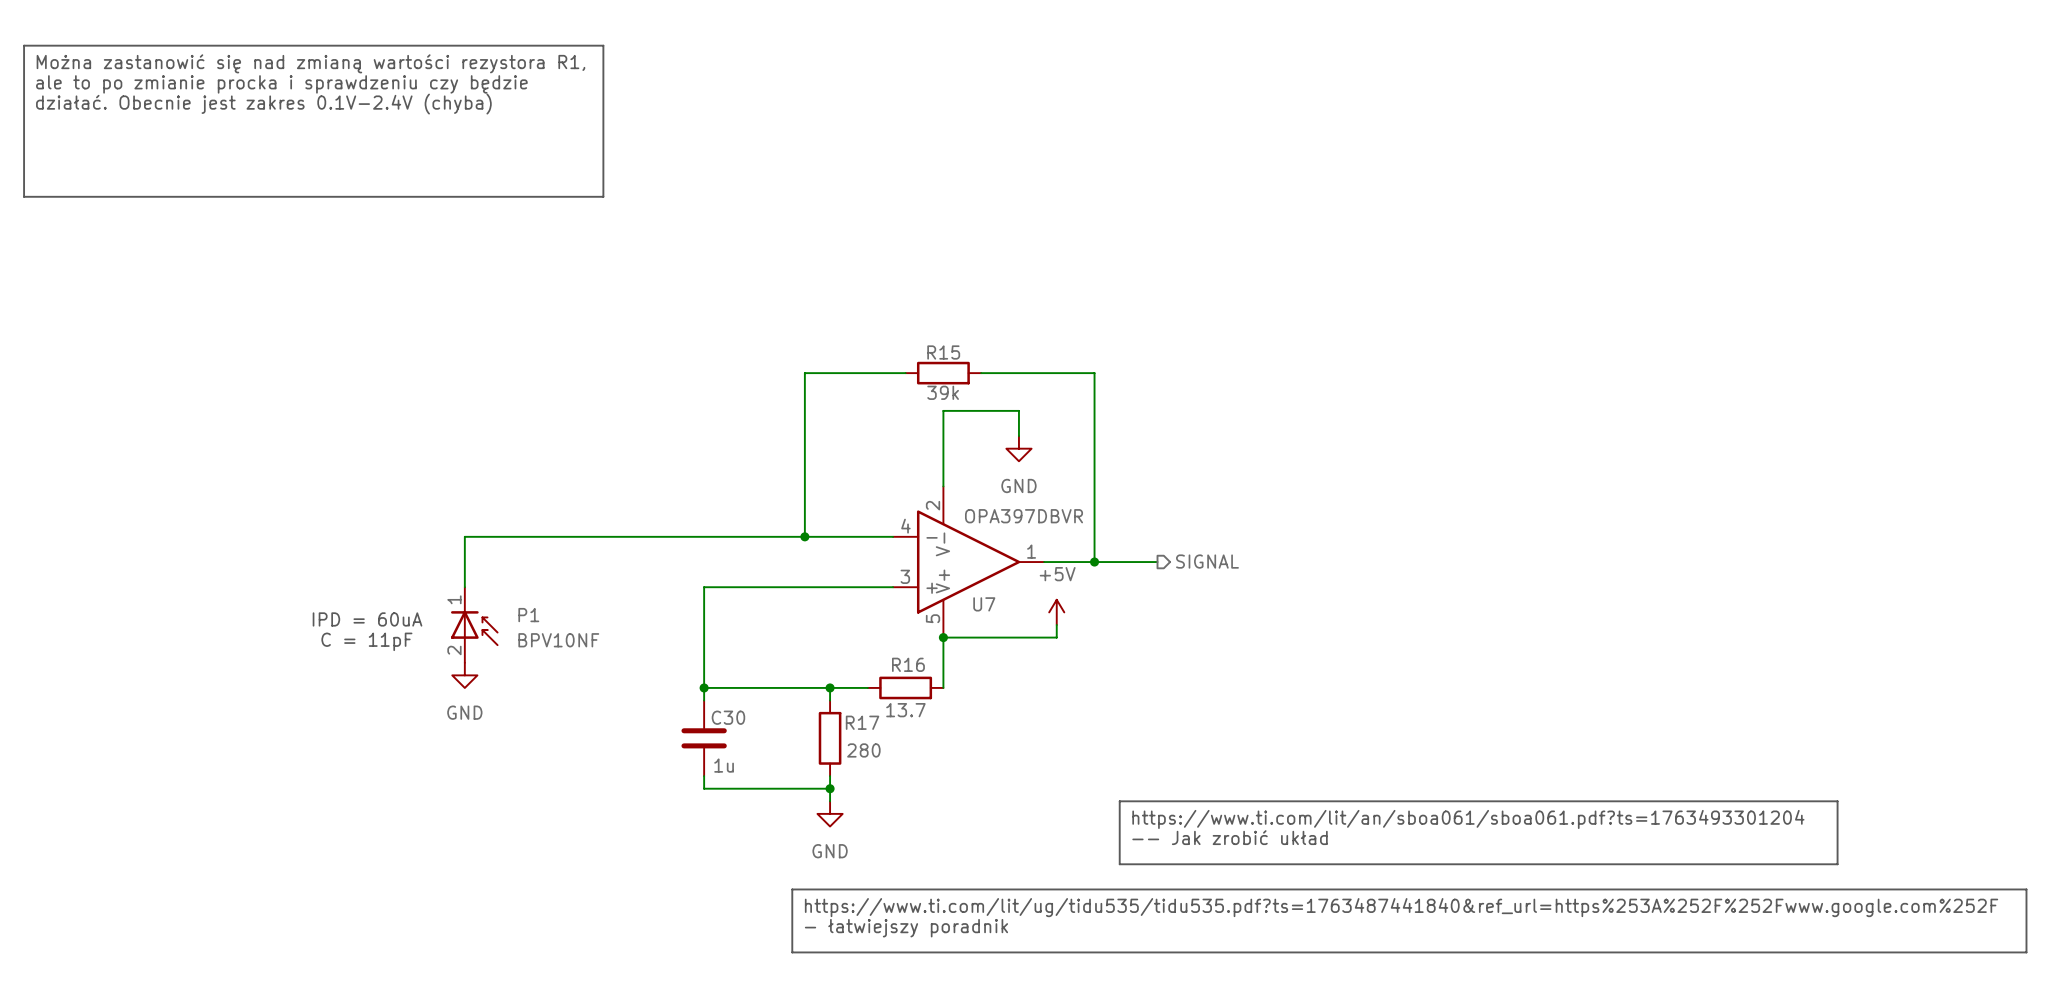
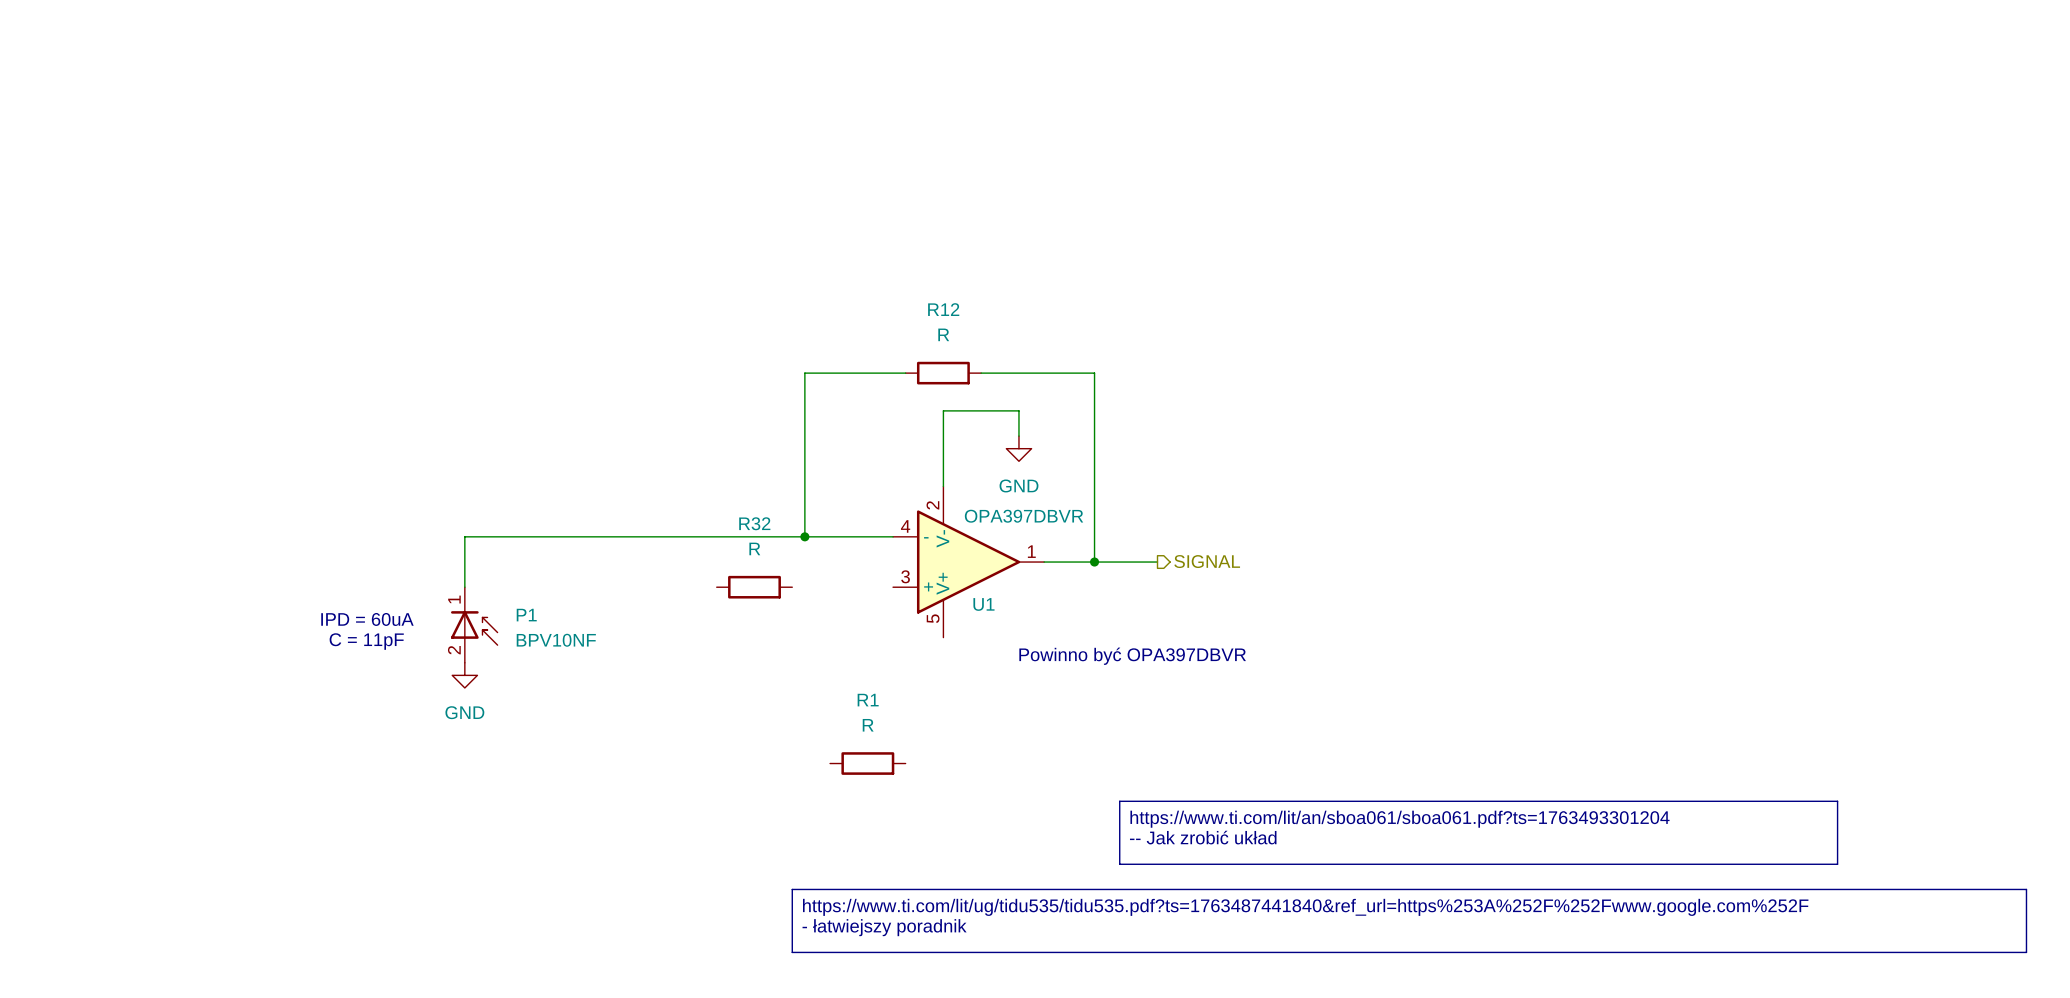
line: (24, 45) (603, 45) (603, 196) (24, 196) (24, 45) -> none
text: Można zastanowić się nad zmianą wartości rezystora R1, (310, 63) -> none
text: ale to po zmianie procka i sprawdzeniu czy będzie (281, 84) -> none
text: działać. Obecnie jest zakres 0.1V-2.4V (chyba) (263, 104) -> none
R15 name: R15 (943, 352) -> R12 (943, 309)
R15 value: 39k (943, 392) -> R (943, 334)
R32: none -> R (754, 587)
wire: (893, 587) (704, 587) (704, 700) -> none
U7 name: U7 (984, 604) -> U1 (983, 604)
power symbol: +5V (1056, 612) -> none
wire: (1056, 624) (1056, 637) (943, 637) (943, 687) -> none
junction: (943, 637) -> none
text: none -> Powinno być OPA397DBVR (1132, 656)
wire: (704, 687) (867, 687) -> none
junction: (704, 687) -> none
wire: (830, 687) (830, 700) -> none
junction: (830, 687) -> none
R16: 13.7 (905, 687) -> none
C30: 1u (704, 738) -> none
R17: 280 (830, 738) -> none
R1: none -> R (867, 763)
wire: (704, 776) (704, 788) (830, 788) -> none
wire: (830, 776) (830, 801) -> none
junction: (830, 788) -> none
power symbol: GND (830, 813) -> none

